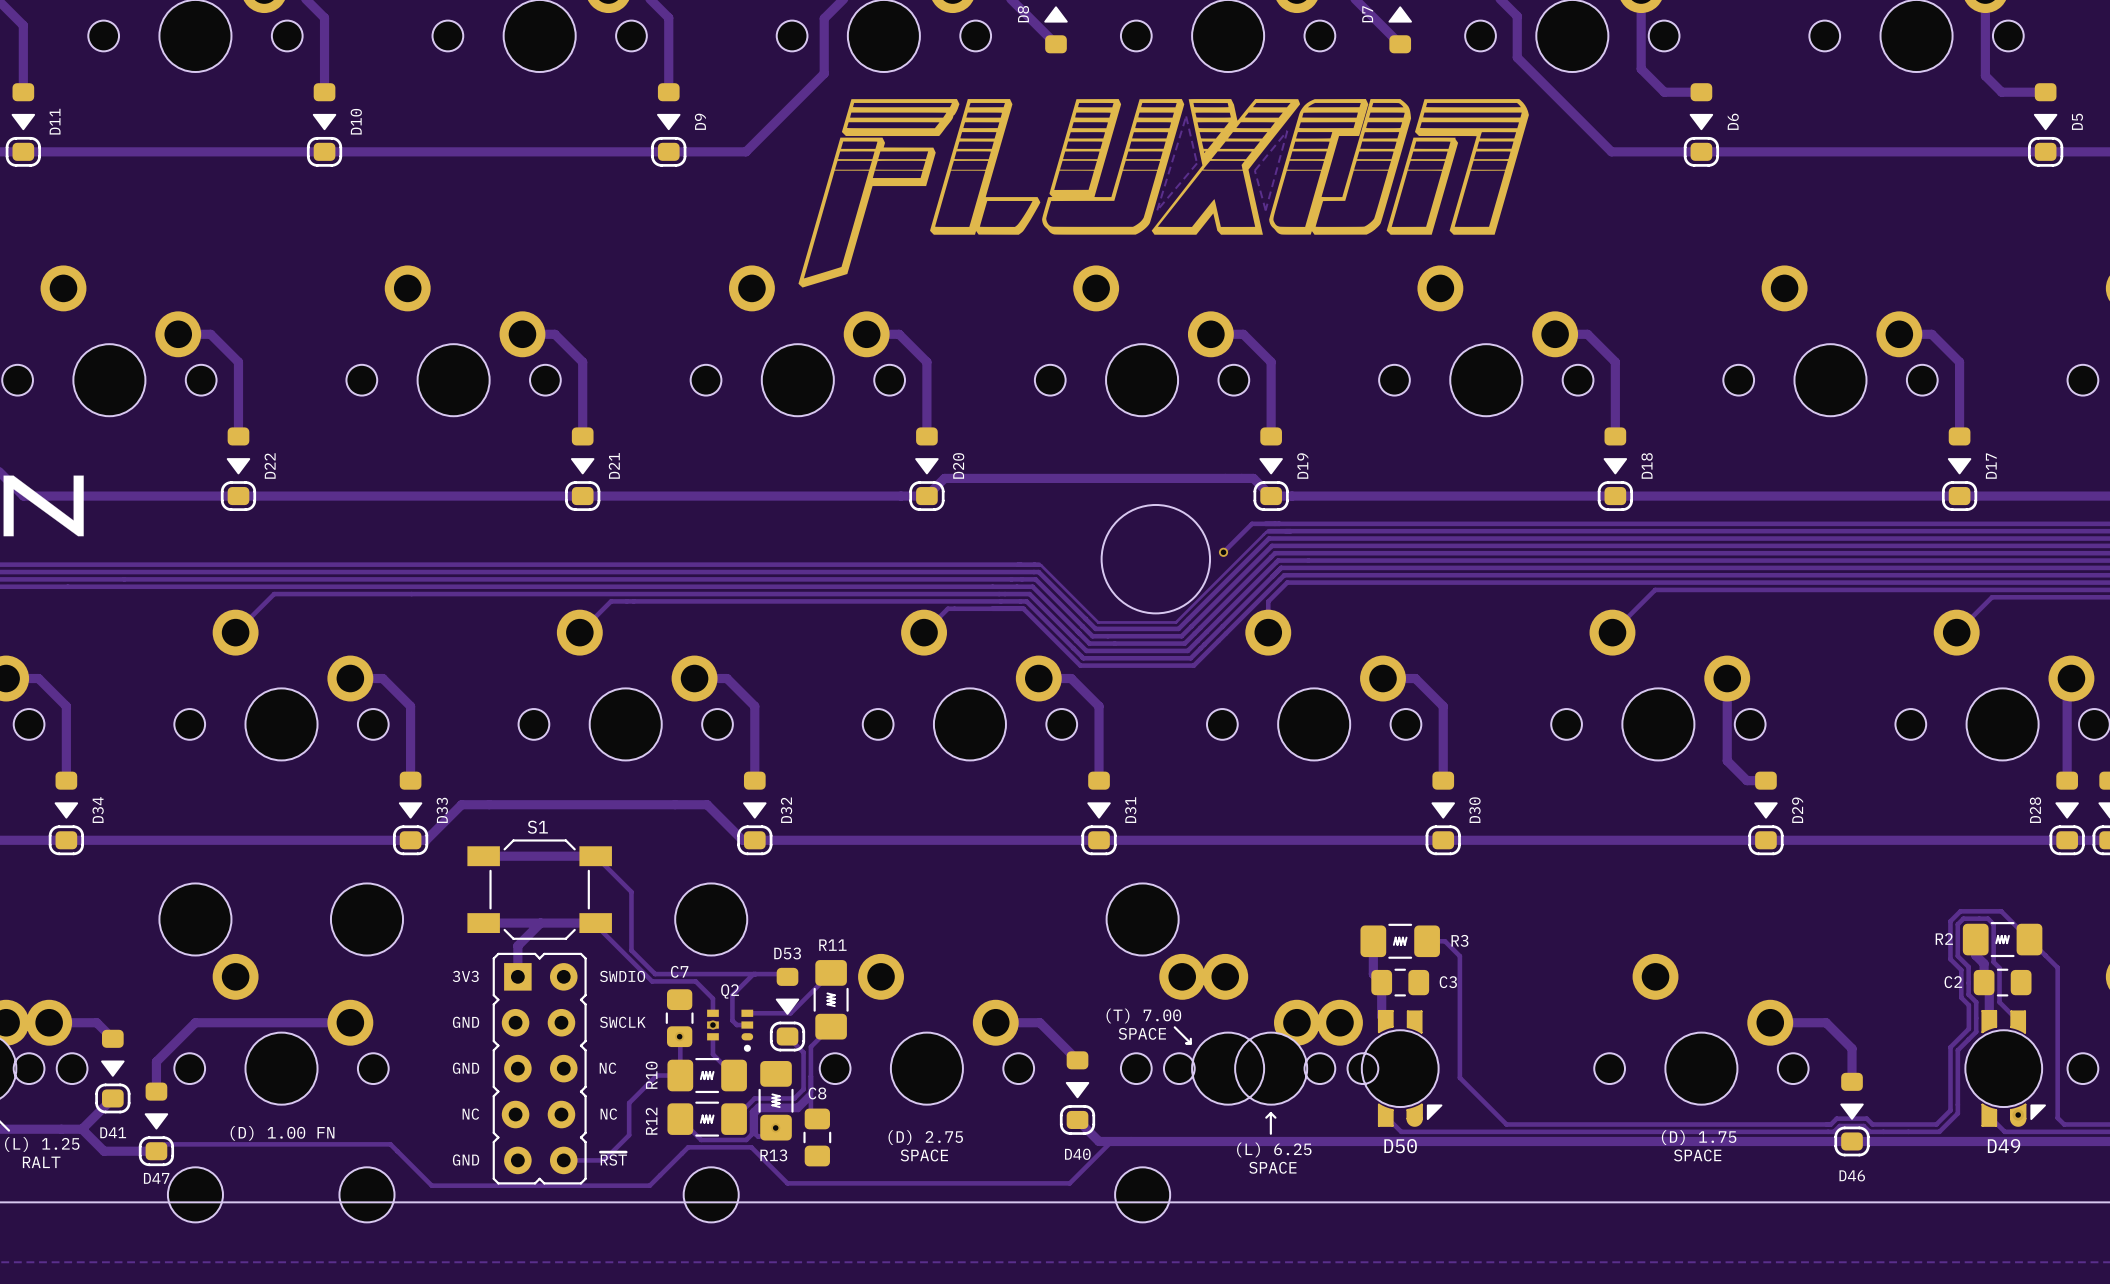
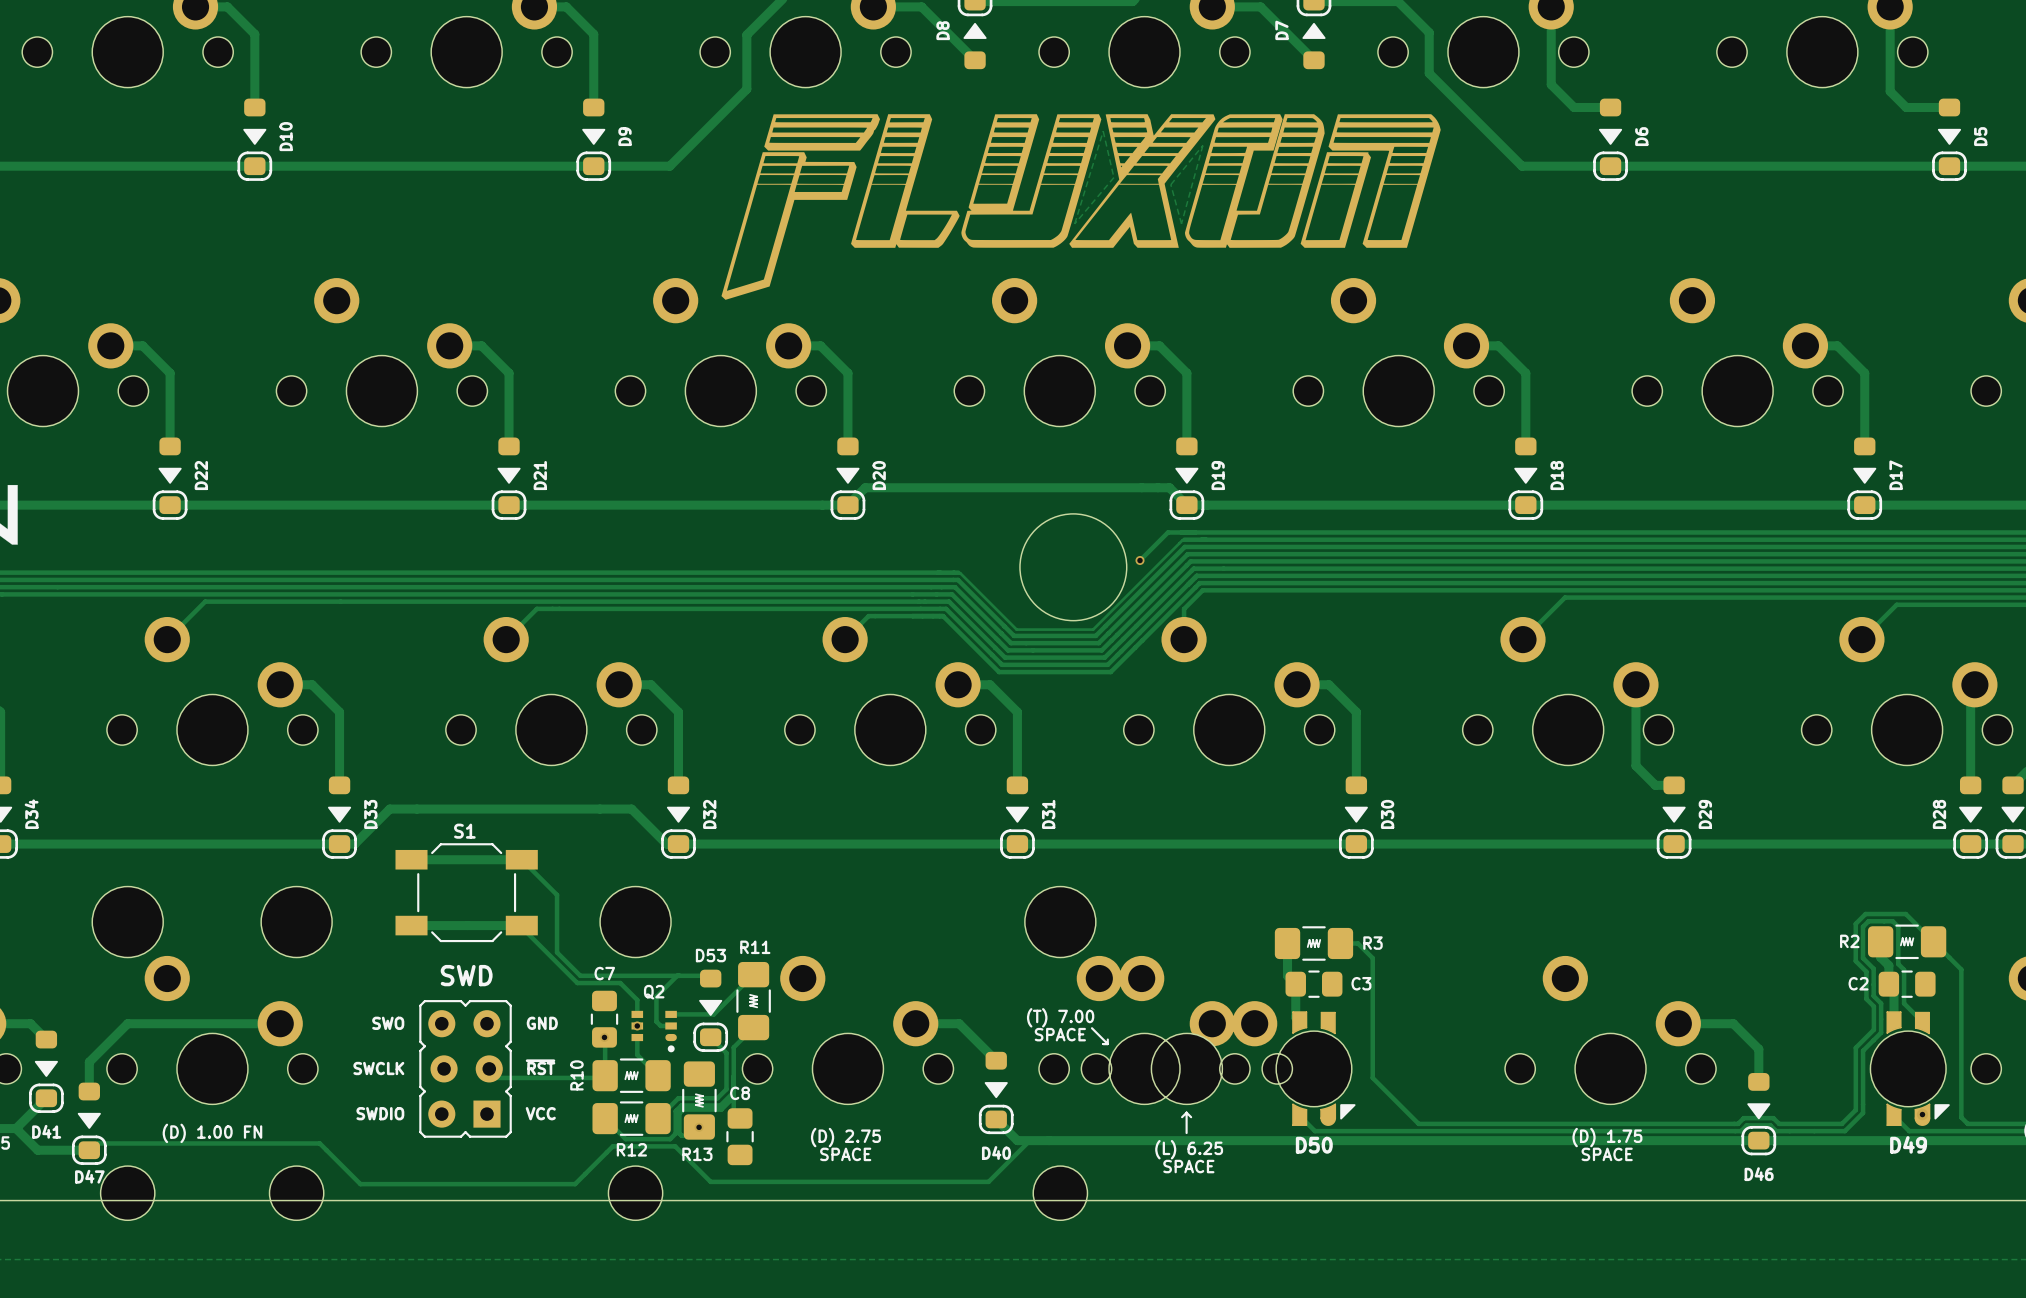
track: (540, 923) (517, 945) (517, 976) -> none
part footprint: [492, 952, 587, 1185] -> [419, 1000, 512, 1138]
track: (680, 1075) (656, 1075) (629, 1103) (629, 1135) (603, 1160) (563, 1160) -> (605, 1075) (602, 1077) (491, 1077)
R12 name rotation: 0° (651, 1121) -> 90° clockwise (631, 1149)
R12 name position: R12 (651, 1121) -> R12 (631, 1149)

